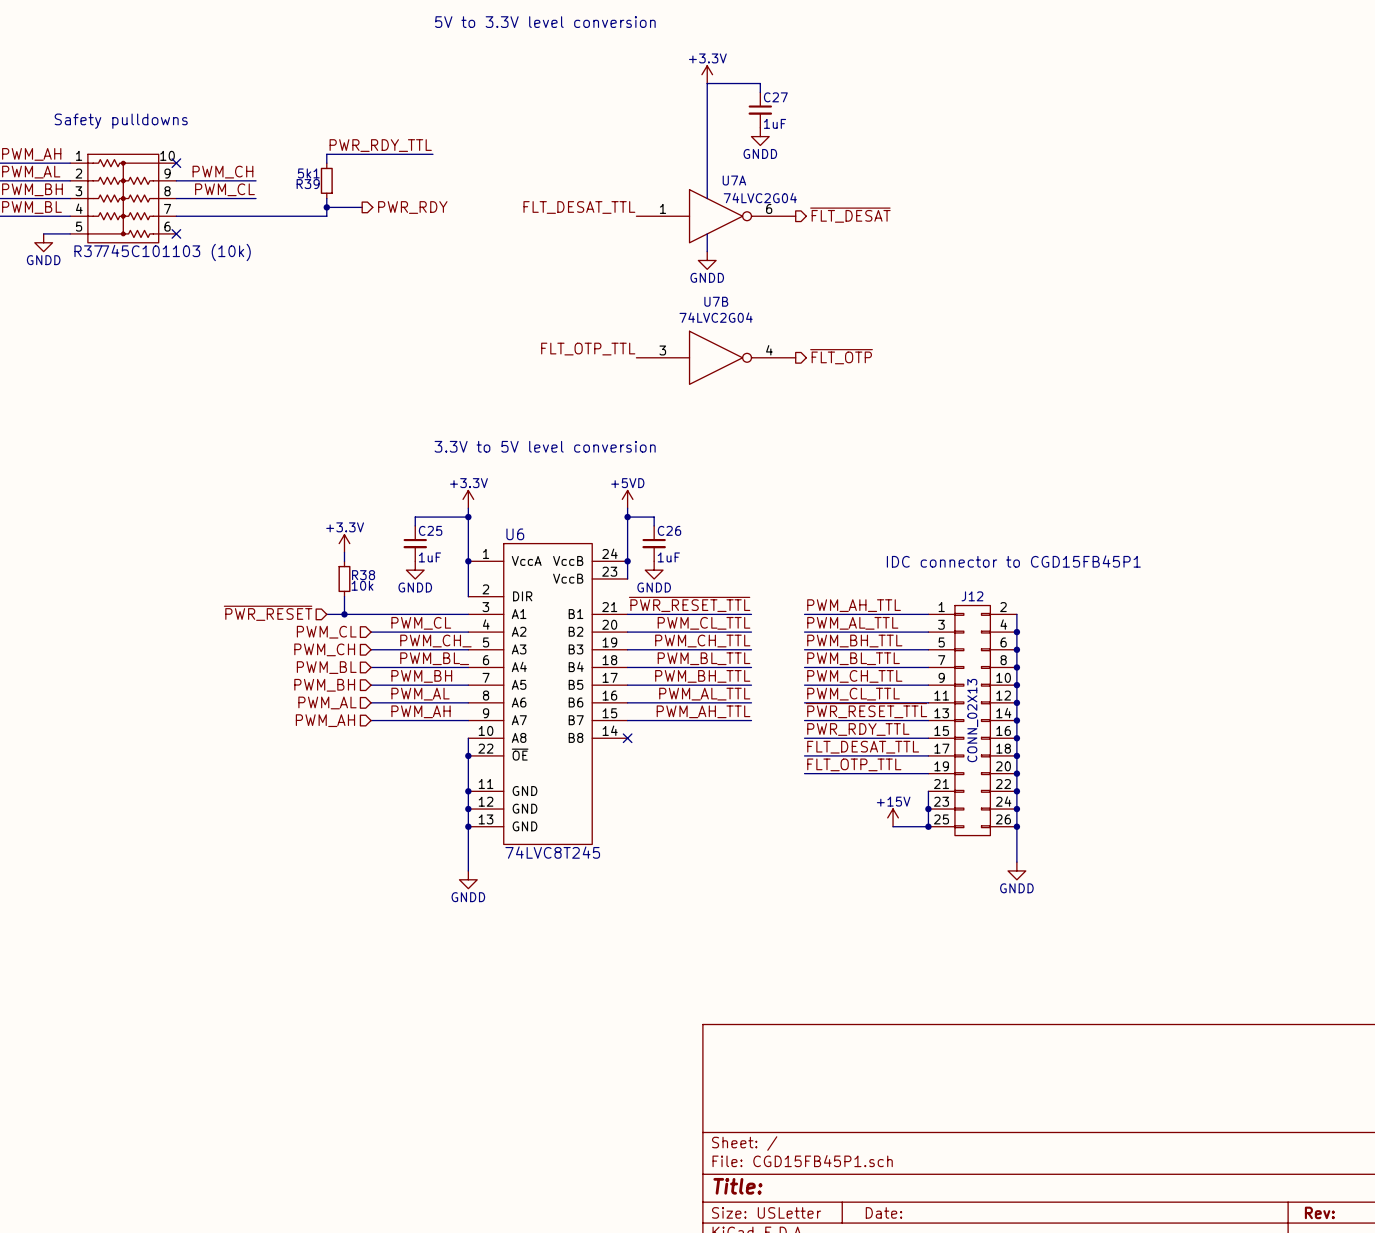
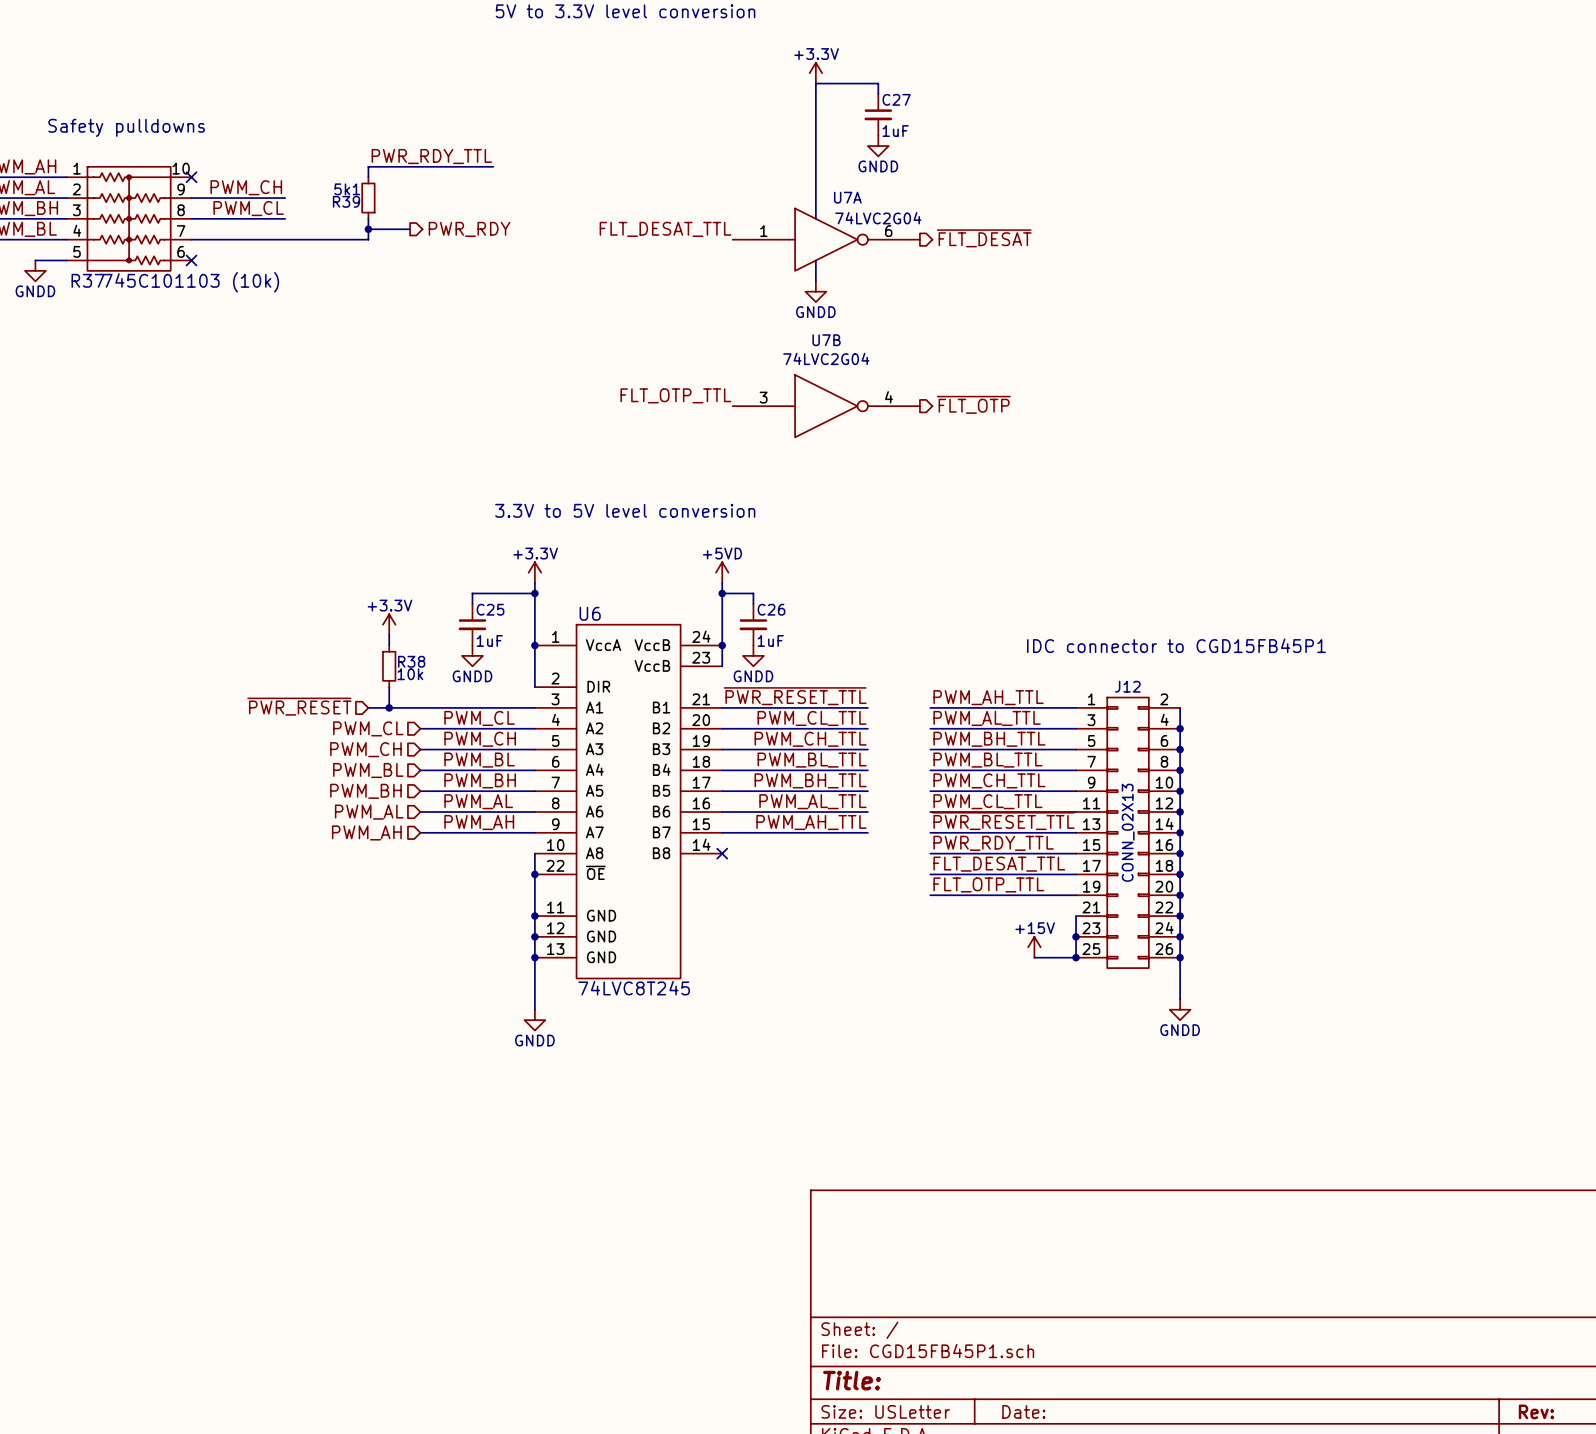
label: PWM_CH_ (435, 641) -> PWM_CH (480, 739)
label: PWM_BL_ (434, 658) -> PWM_BL (479, 760)

